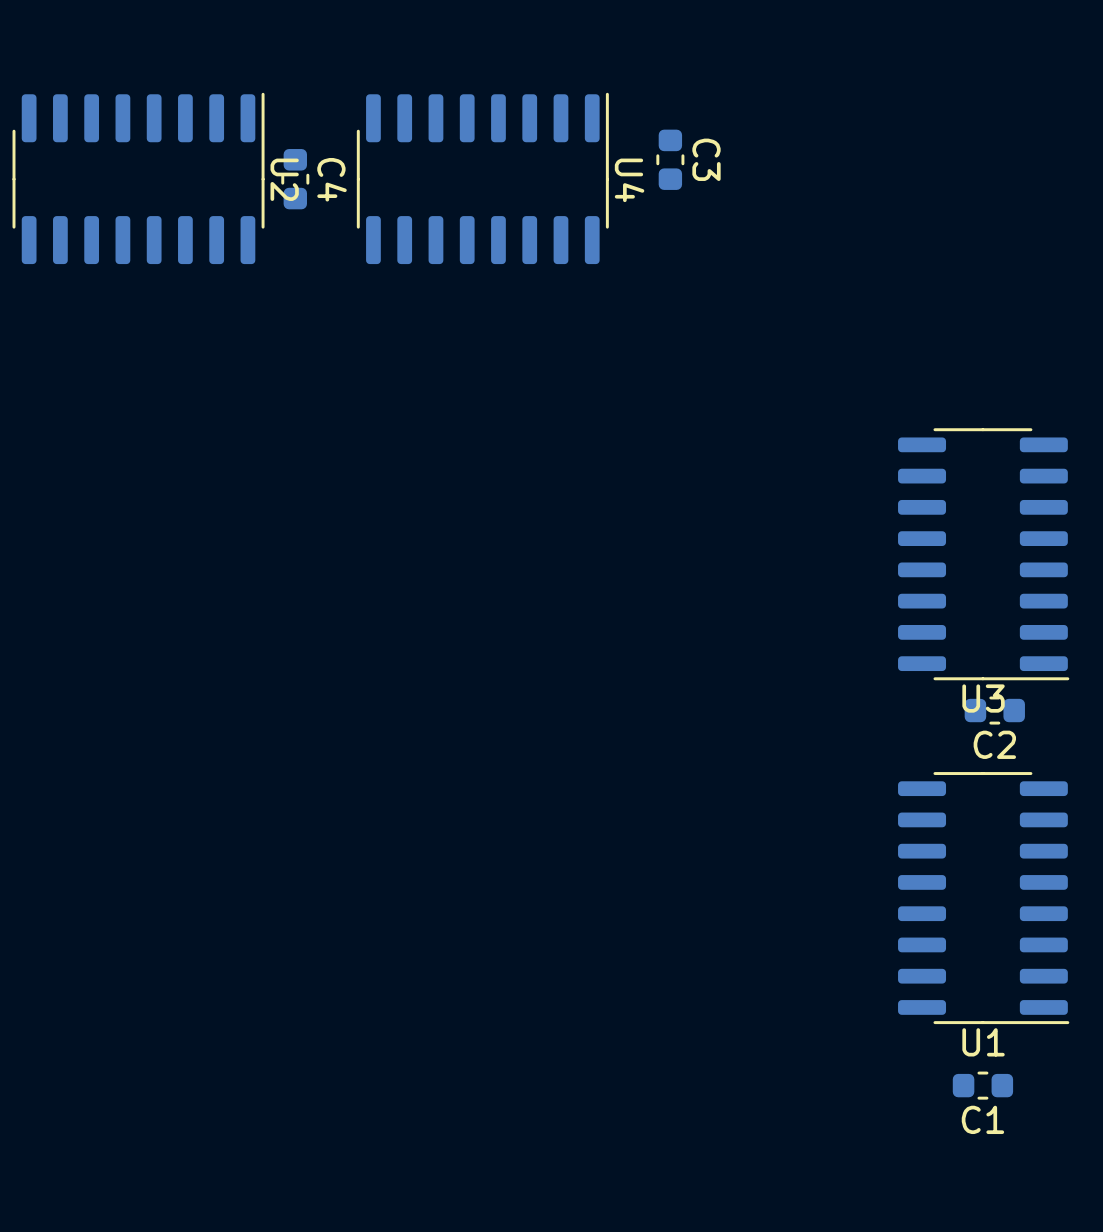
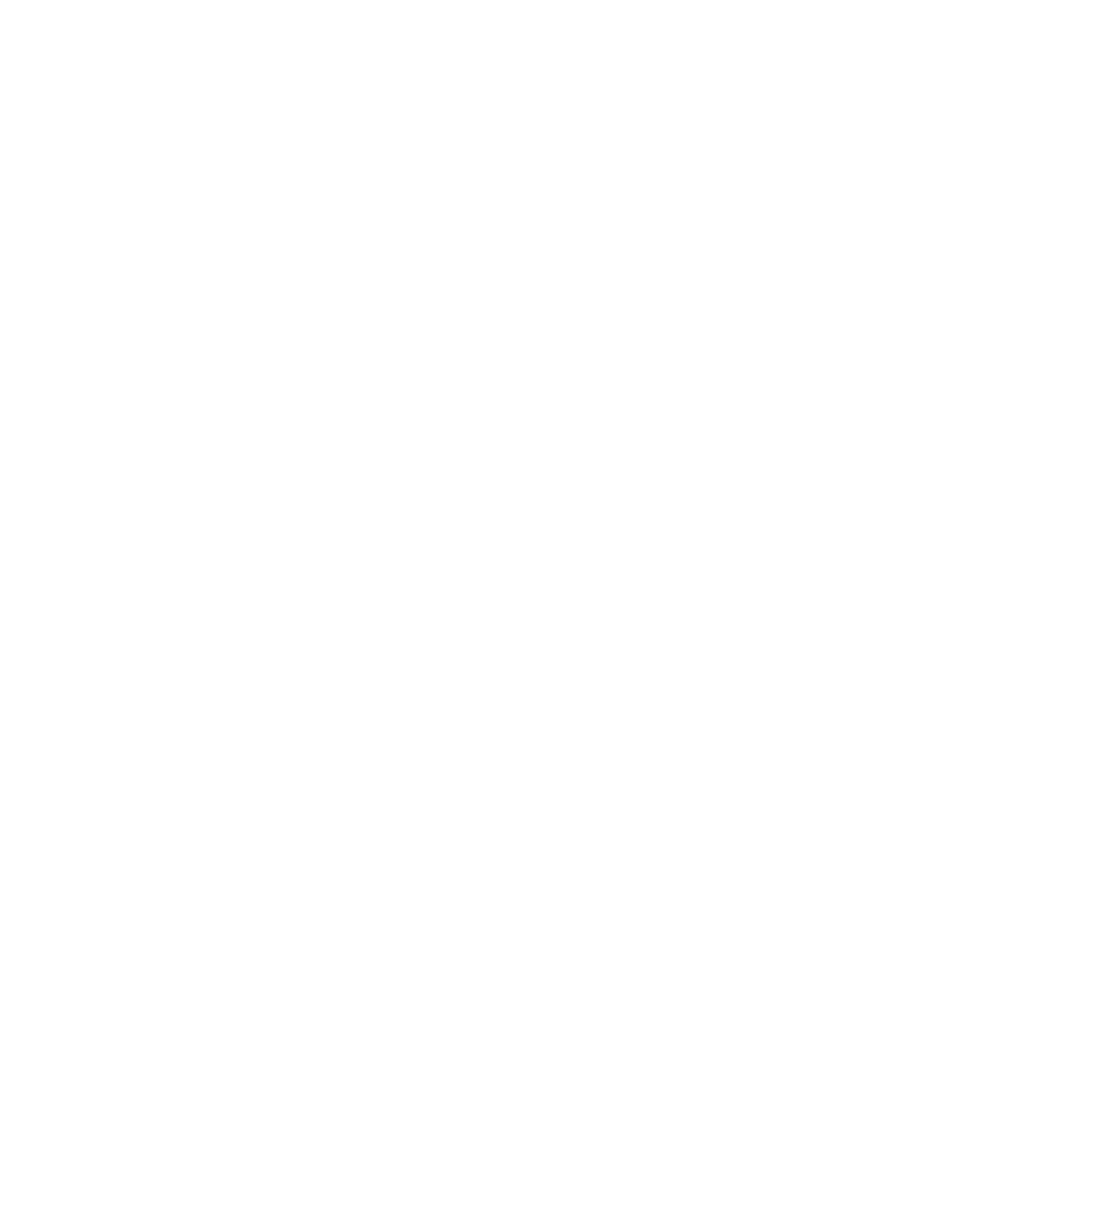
C3: (670, 159) -> none
U2: (138, 178) -> none
U4: (482, 178) -> none
C4: (295, 179) -> none
U3: (983, 554) -> none
C2: (994, 710) -> none
U1: (983, 898) -> none
C1: (982, 1085) -> none

